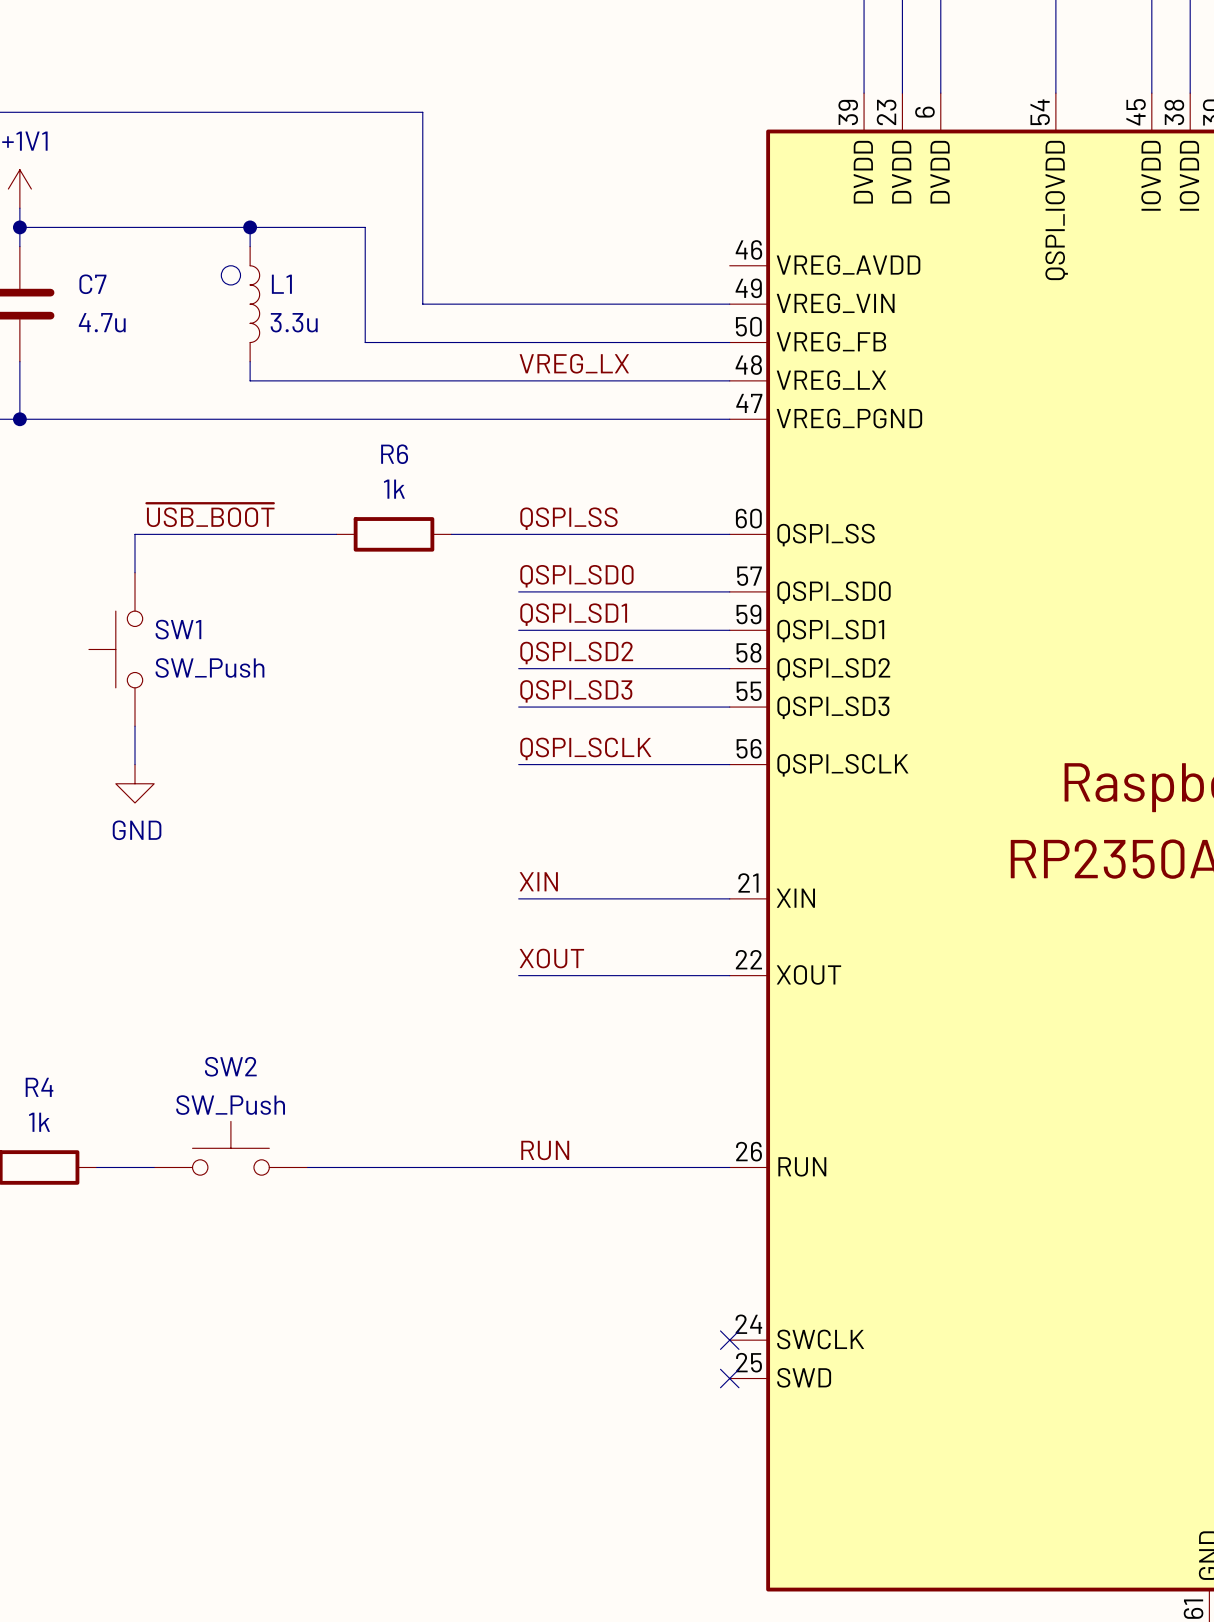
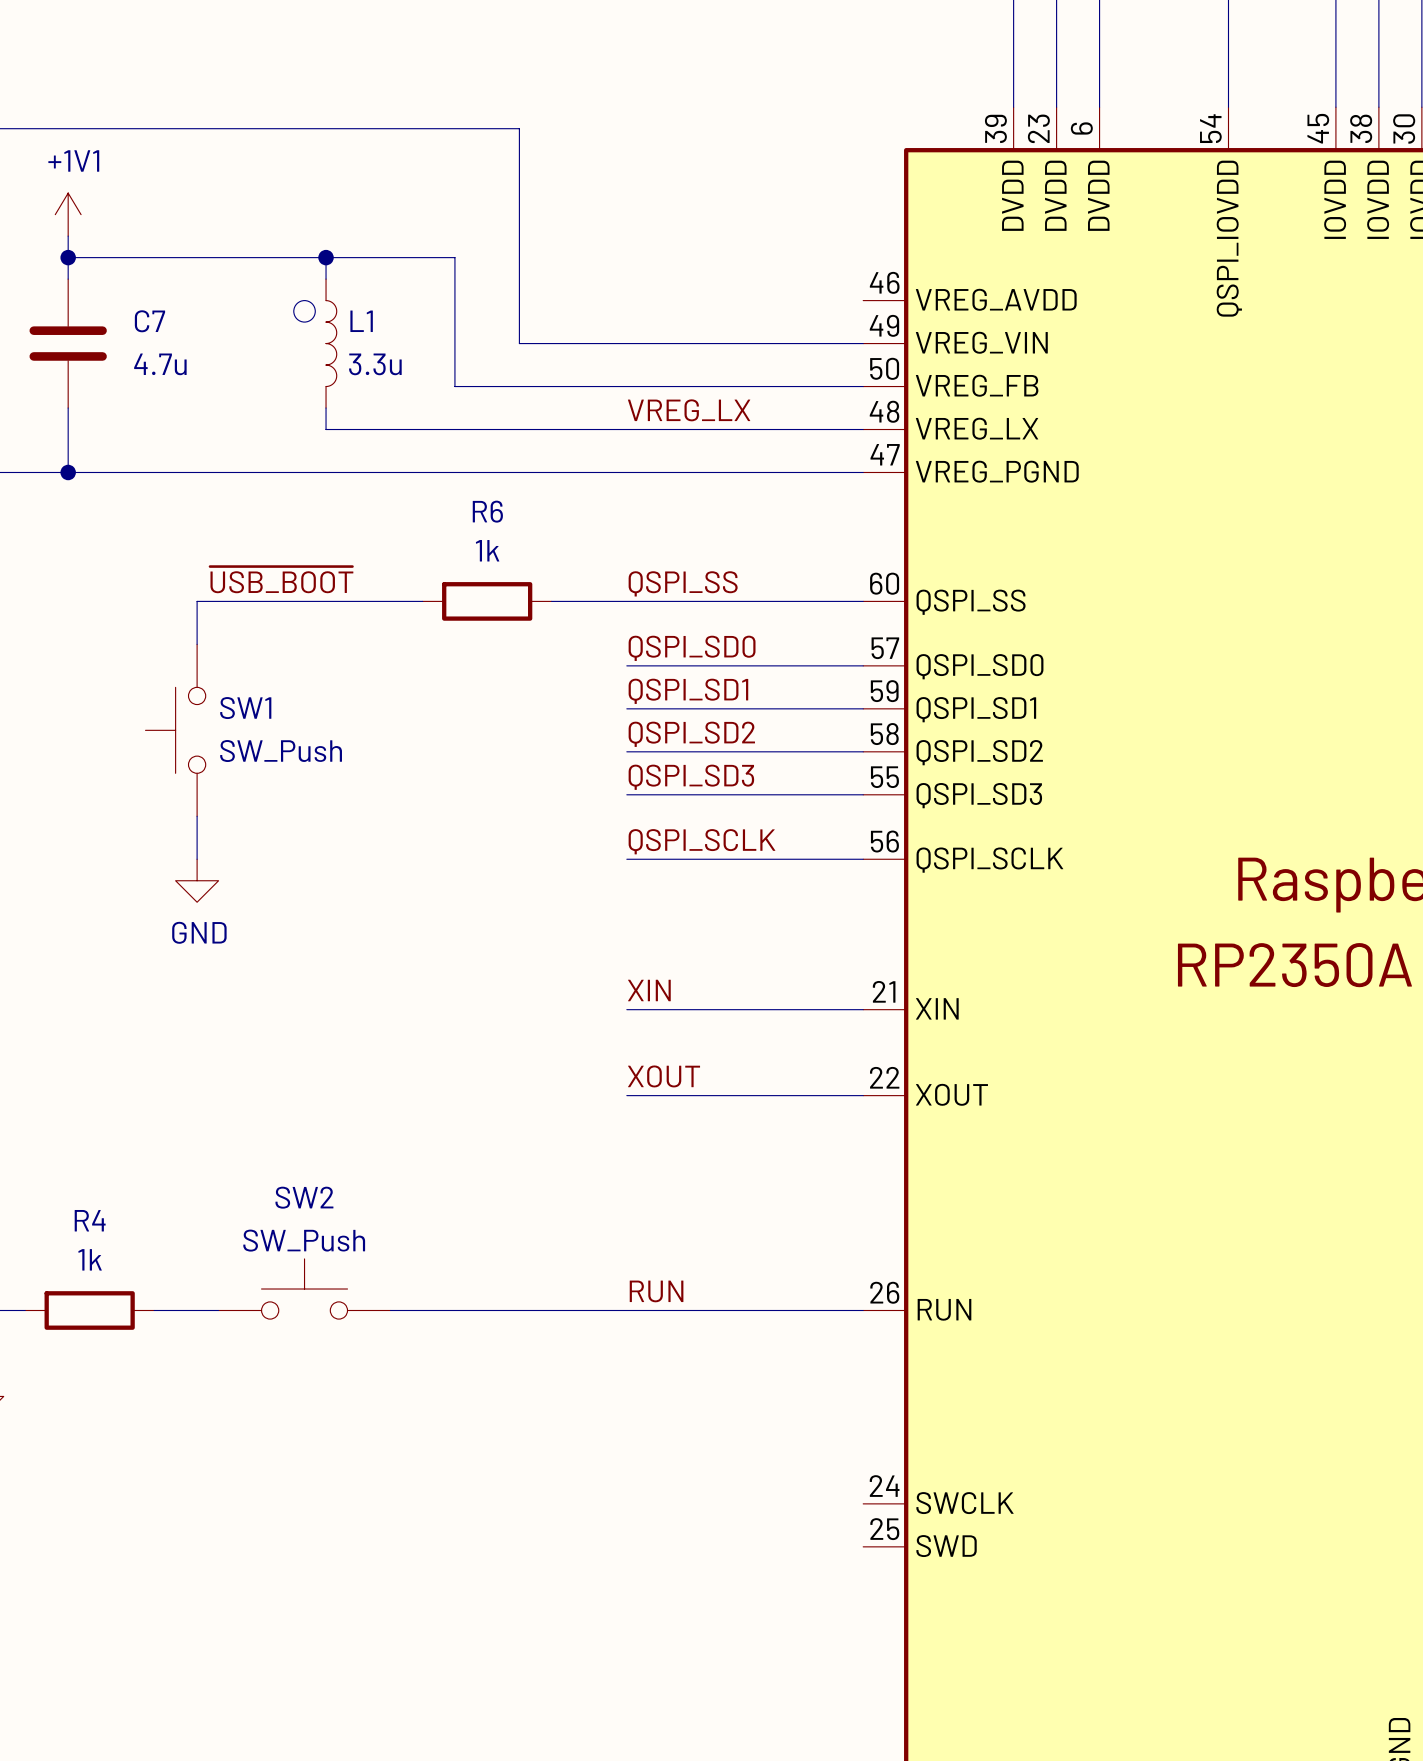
no-connect mark: (729, 1340) -> none
no-connect mark: (729, 1378) -> none

